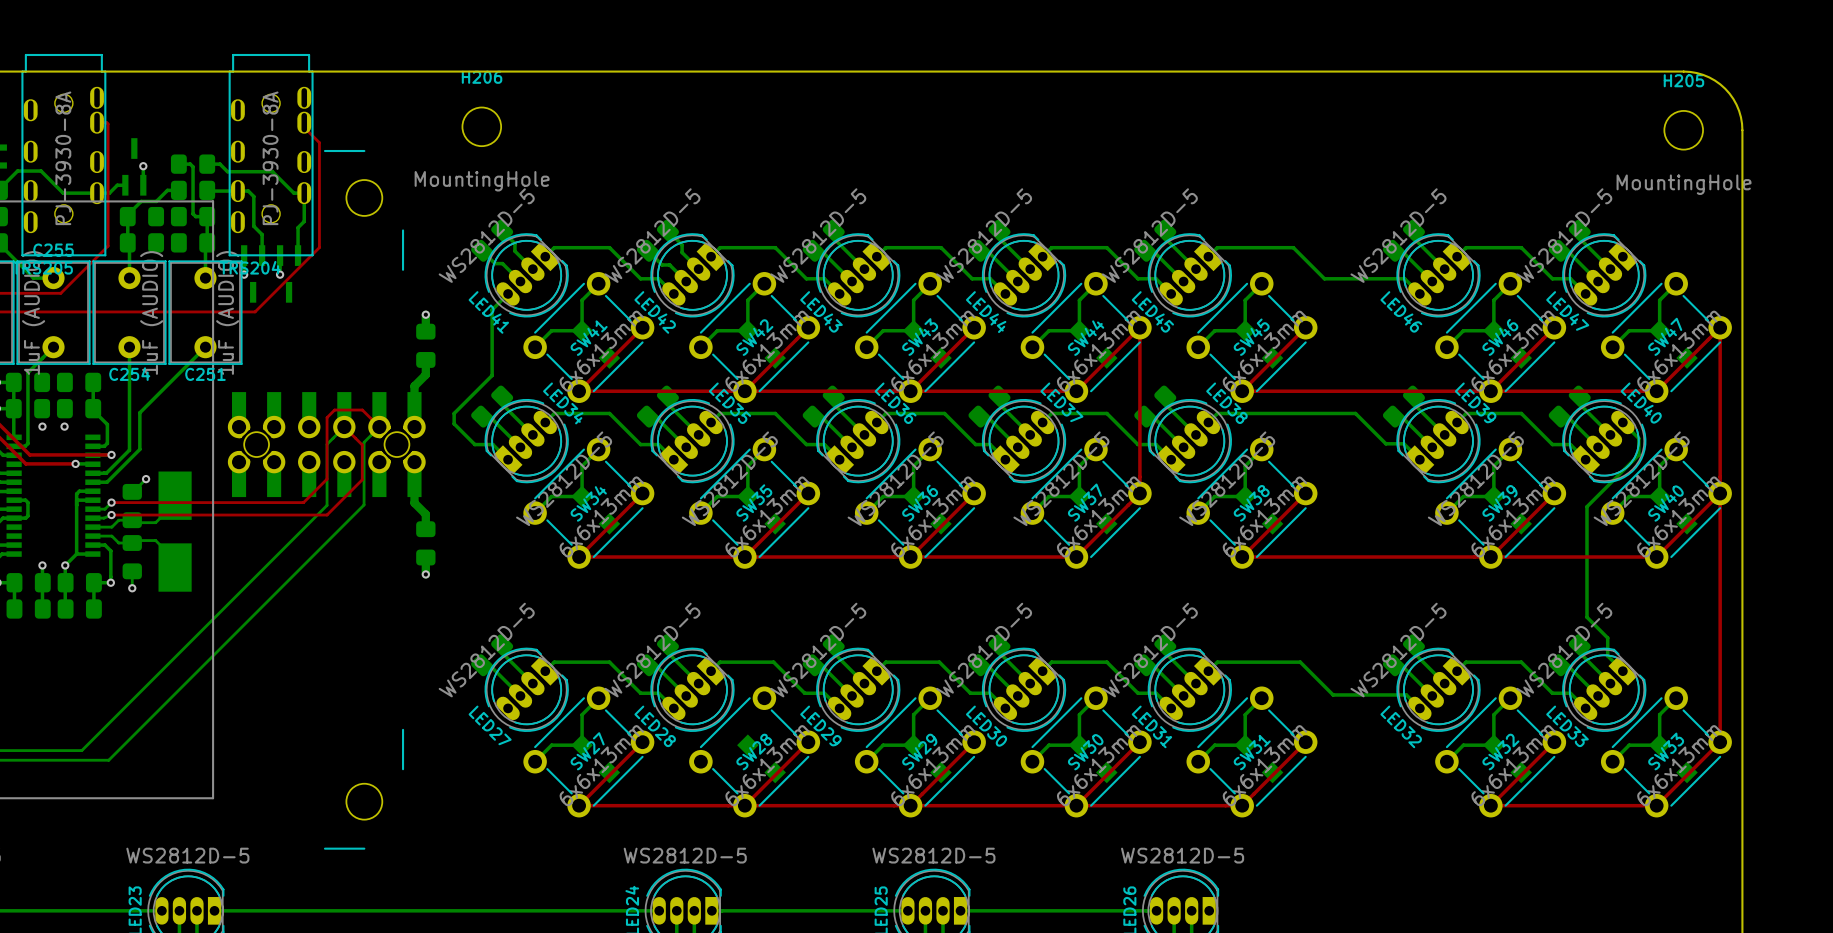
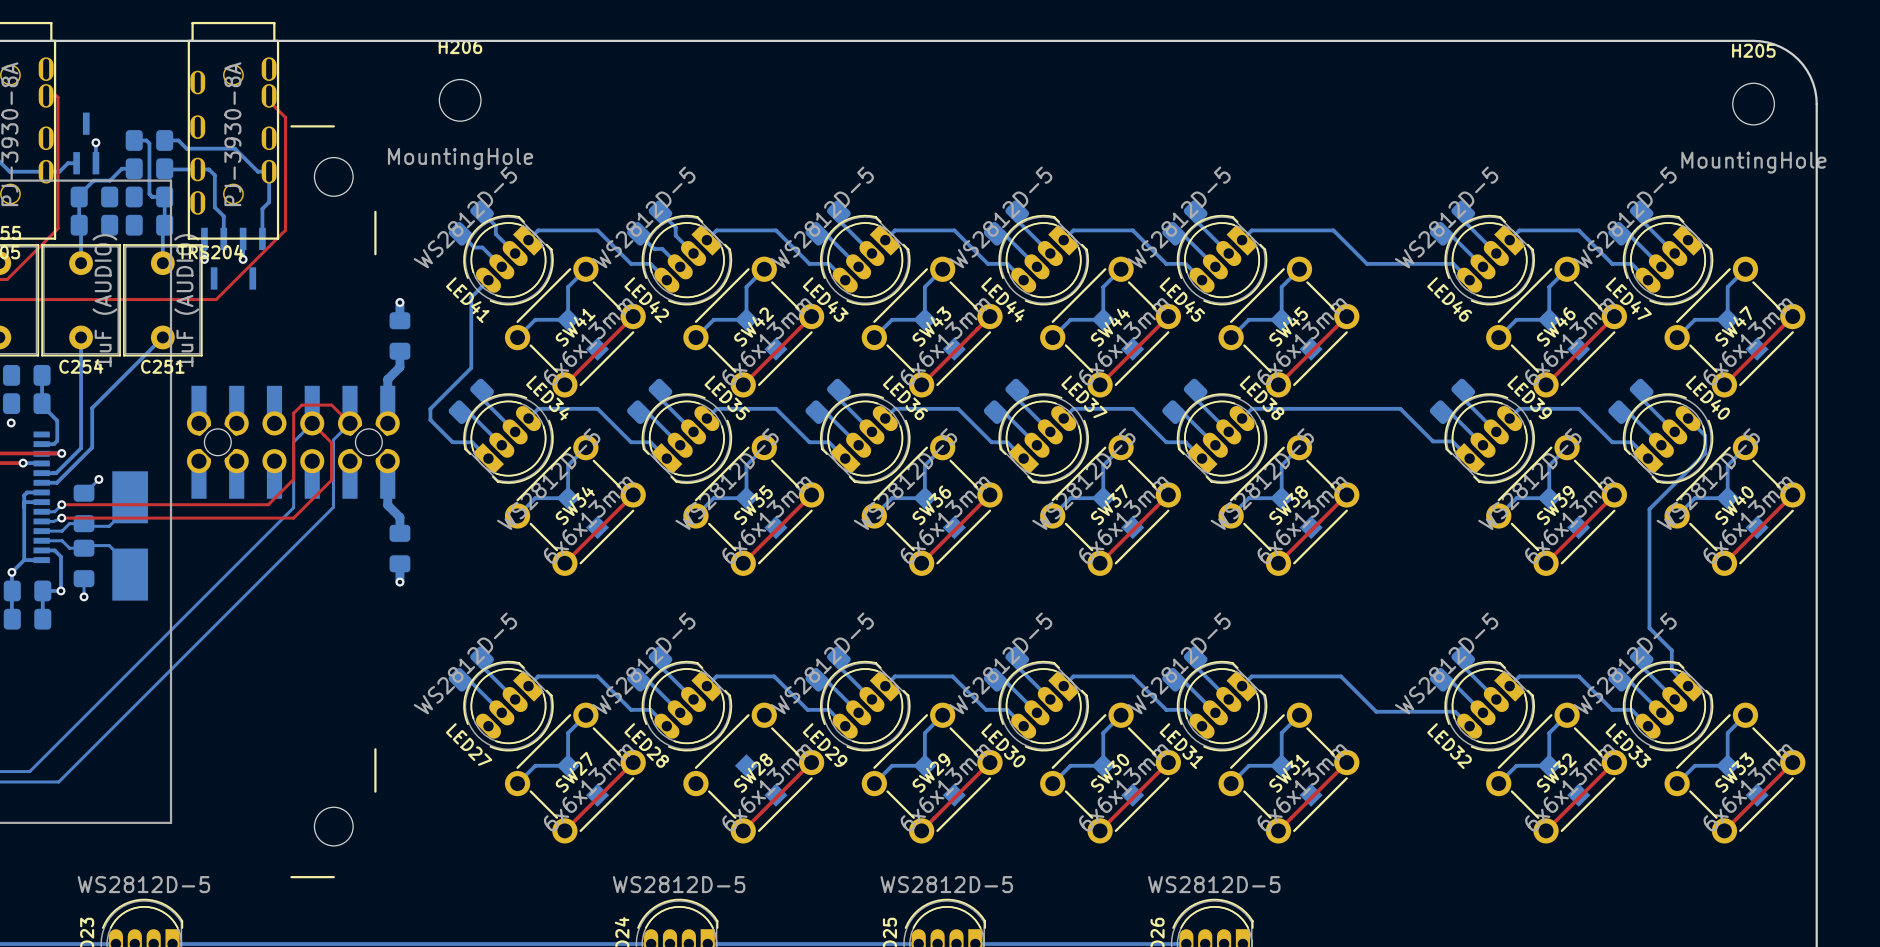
top track: (1139, 327) (1139, 493) -> none
top track: (1720, 327) (1720, 742) -> none
top track: (579, 391) (1076, 391) -> none
top track: (1242, 391) (1656, 391) -> none
top track: (579, 557) (1076, 557) -> none
top track: (1242, 557) (1656, 557) -> none
top track: (579, 805) (1242, 805) -> none
top track: (1490, 805) (1656, 805) -> none

